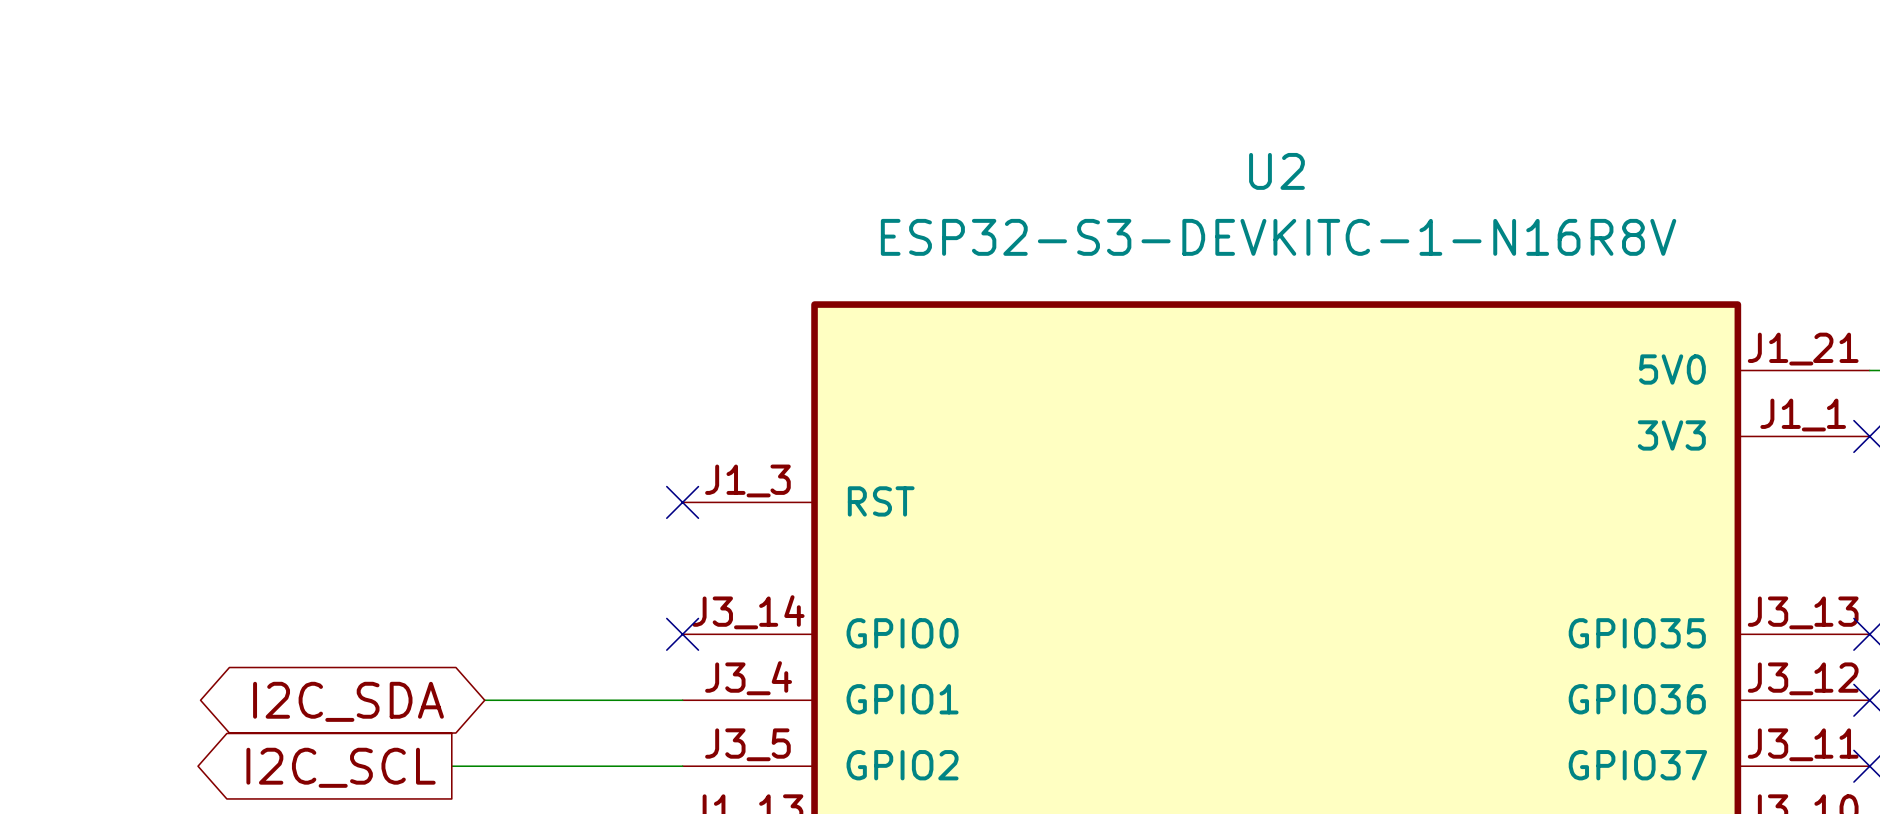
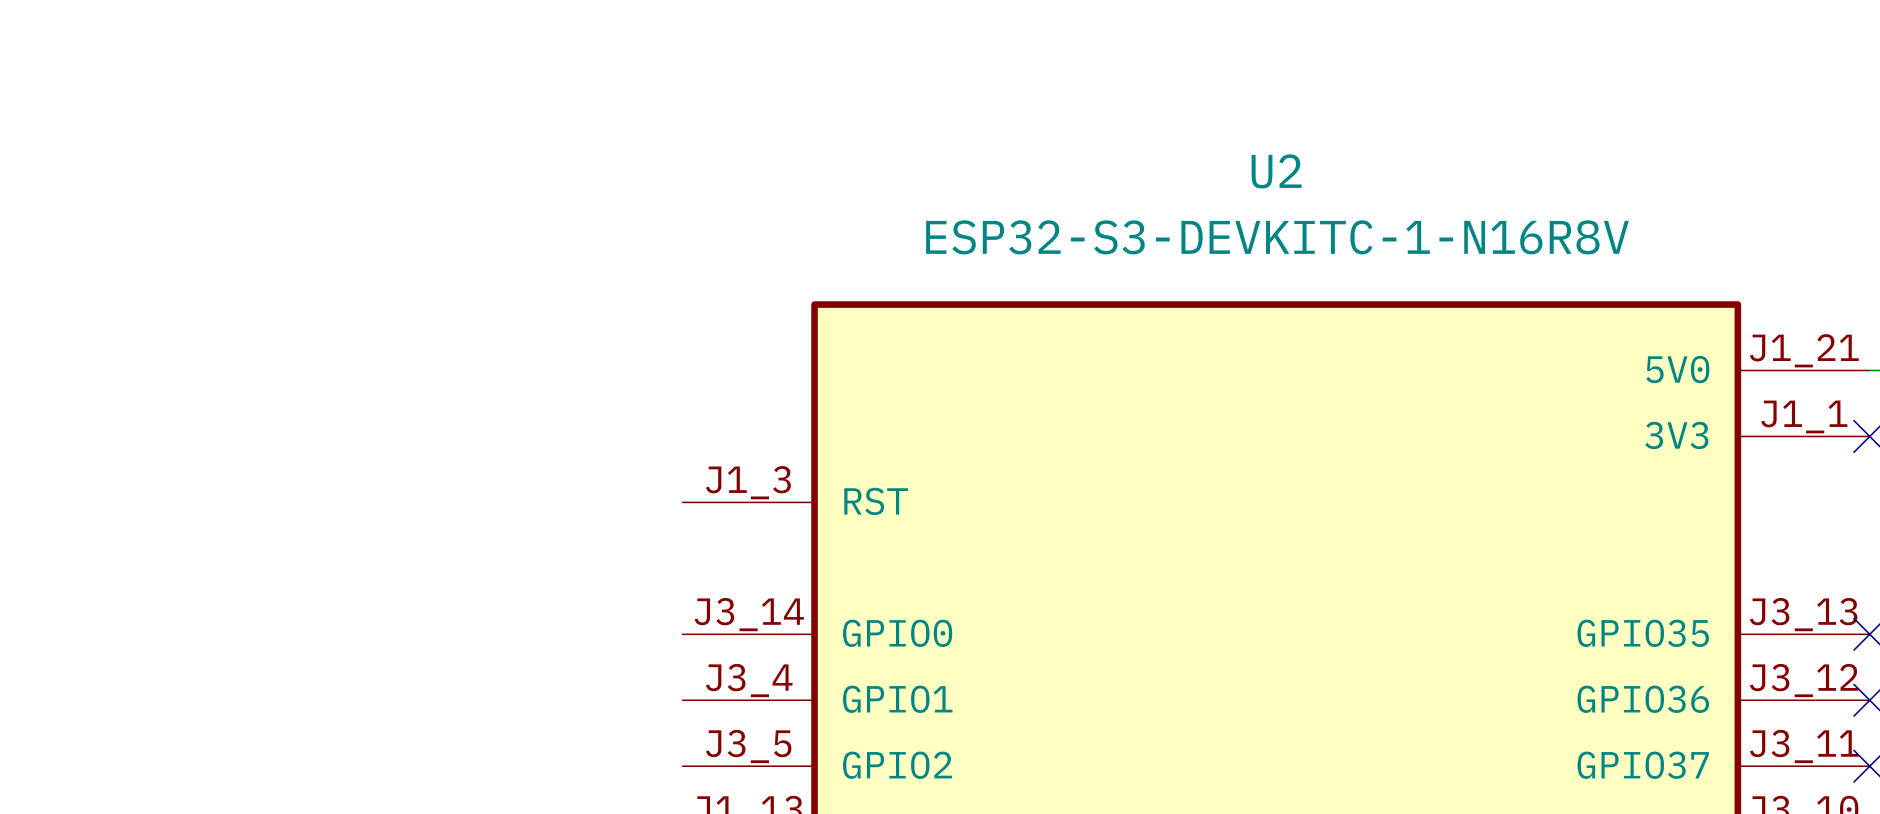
no-connect mark: (682, 502) -> none
no-connect mark: (682, 634) -> none
wire: (484, 700) (682, 700) -> none
global label: I2C_SDA (348, 701) -> none
wire: (451, 766) (682, 766) -> none
global label: I2C_SCL (341, 767) -> none

